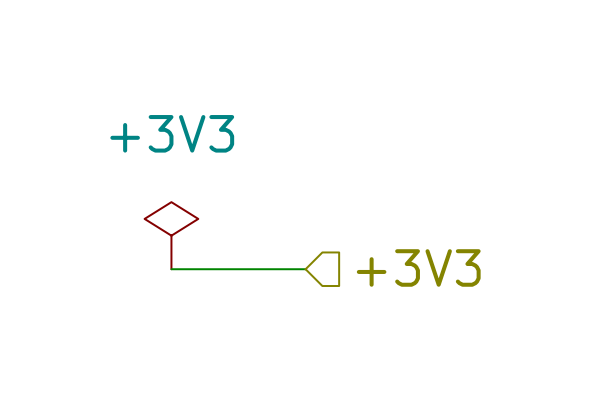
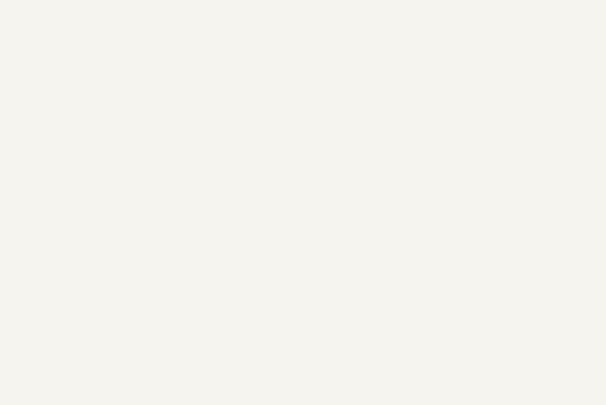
power symbol: +3V3 (171, 235) -> none
hierarchical label: +3V3 (418, 267) -> none
wire: (171, 269) (305, 269) -> none

